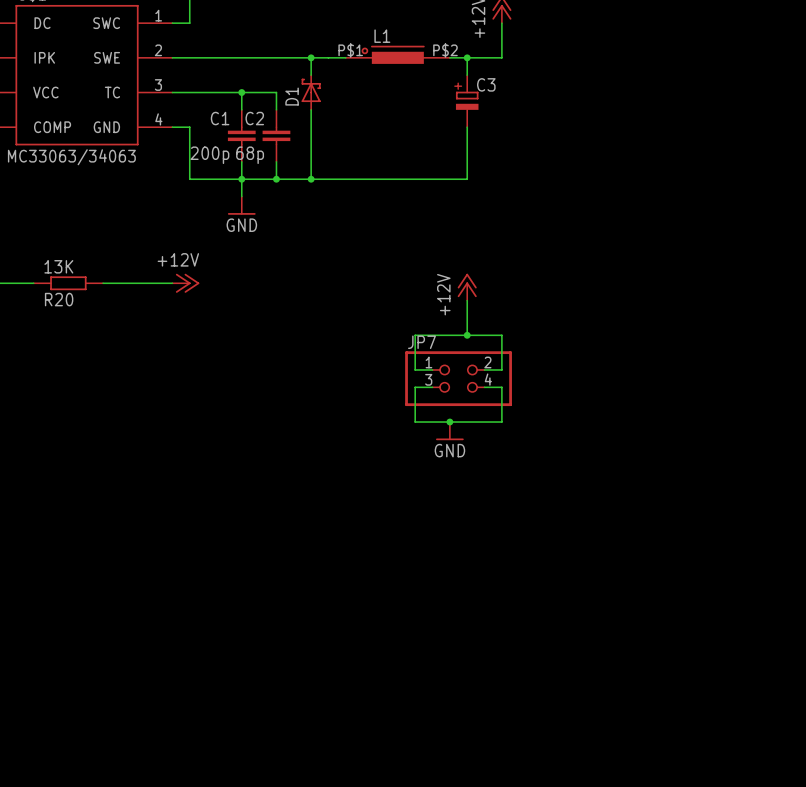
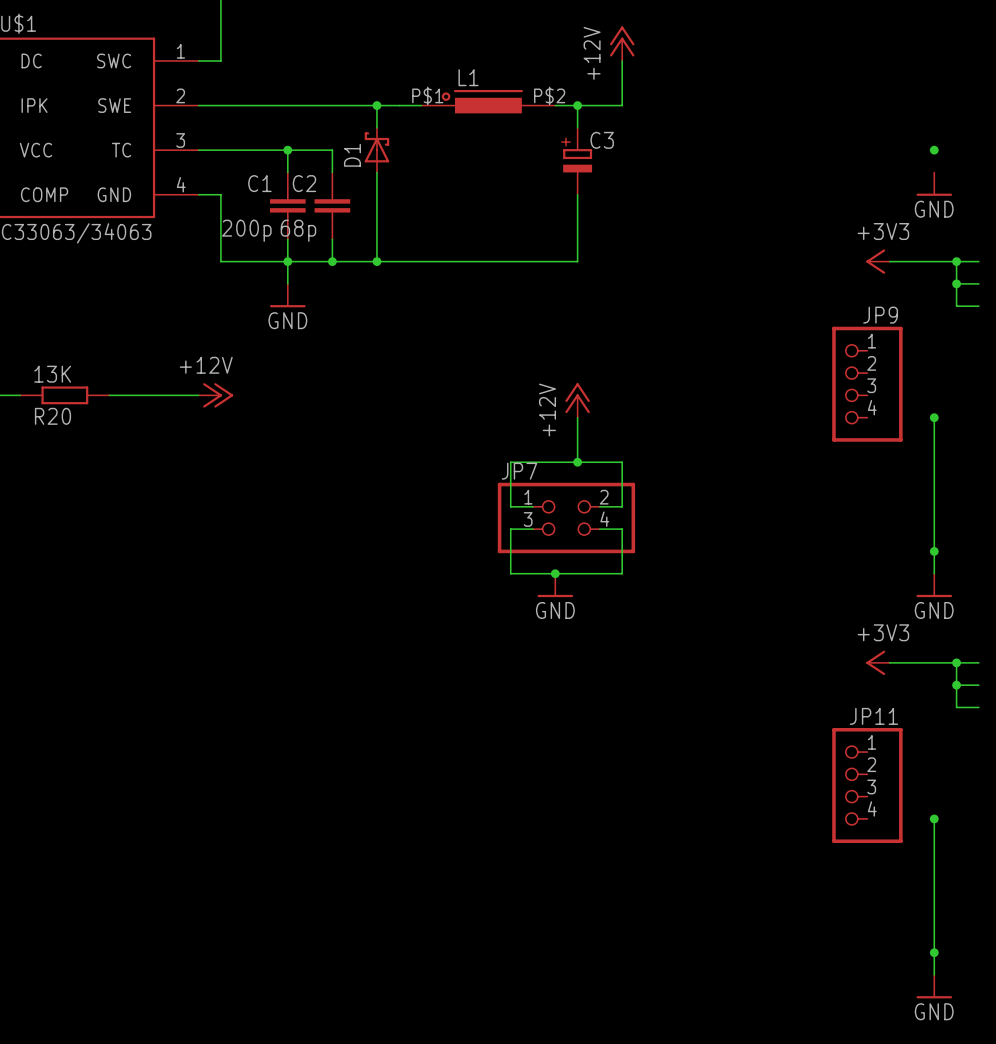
junction: none -> (934, 150)
power symbol: none -> GND (934, 184)
power symbol: none -> +3V3 (877, 261)
wire: none -> (889, 261) (978, 261)
wire: none -> (956, 261) (956, 306) (978, 306)
junction: none -> (956, 261)
wire: none -> (956, 283) (978, 283)
junction: none -> (956, 283)
JP9: none -> (867, 384)
wire: none -> (934, 417) (934, 573)
junction: none -> (934, 417)
junction: none -> (934, 551)
power symbol: none -> GND (934, 585)
power symbol: none -> +3V3 (877, 662)
wire: none -> (889, 662) (978, 662)
wire: none -> (956, 662) (956, 707) (978, 707)
junction: none -> (956, 662)
wire: none -> (956, 685) (978, 685)
junction: none -> (956, 685)
JP11: none -> (867, 785)
wire: none -> (934, 818) (934, 974)
junction: none -> (934, 818)
junction: none -> (934, 952)
power symbol: none -> GND (934, 986)

